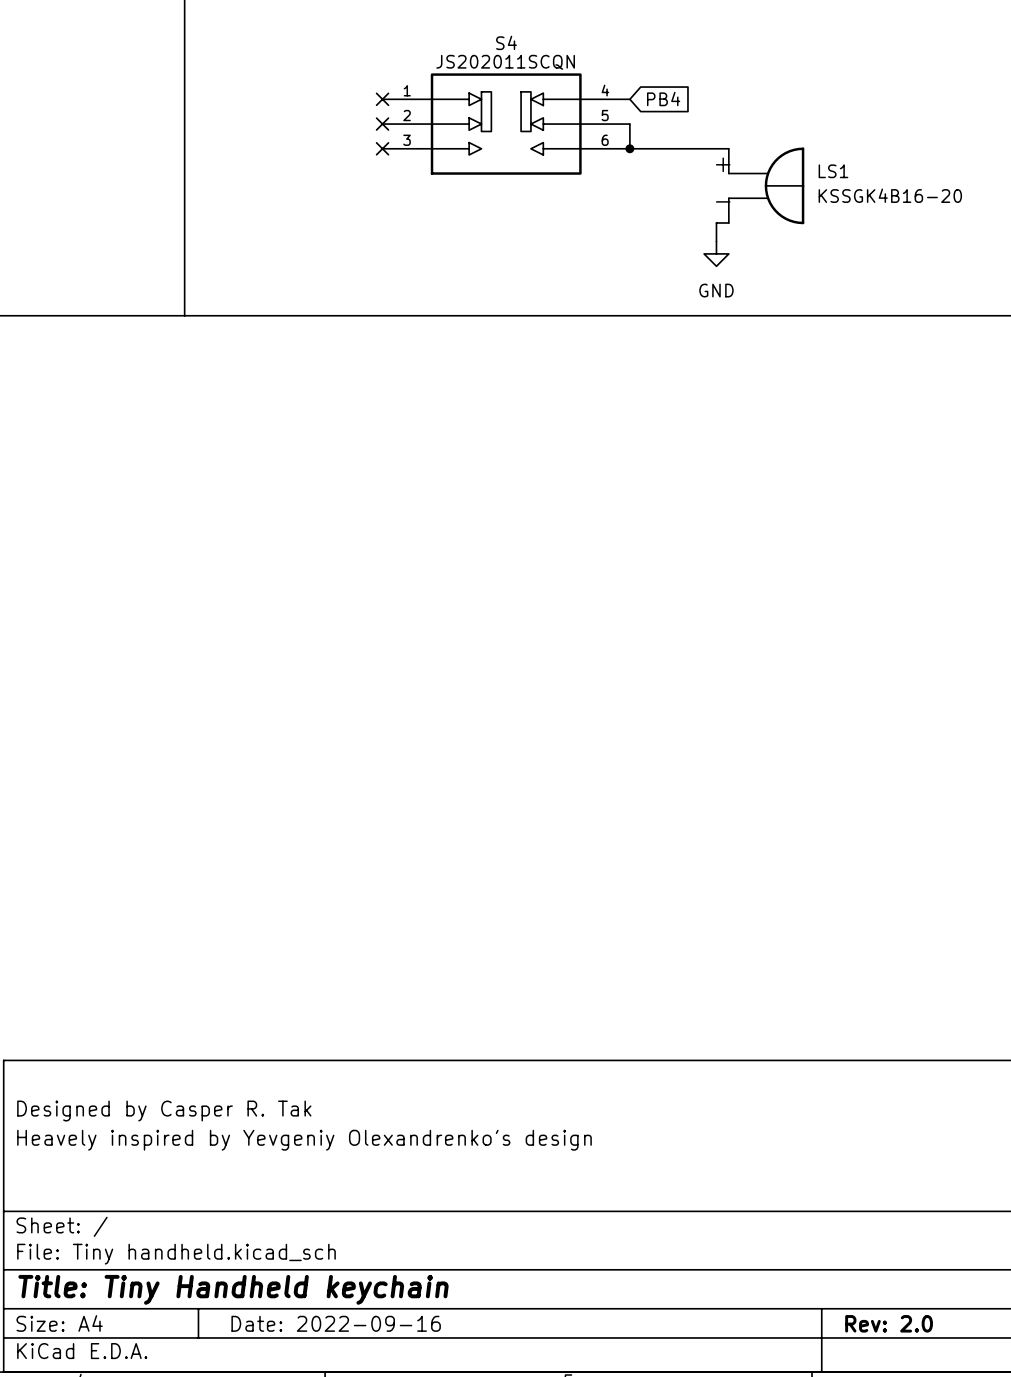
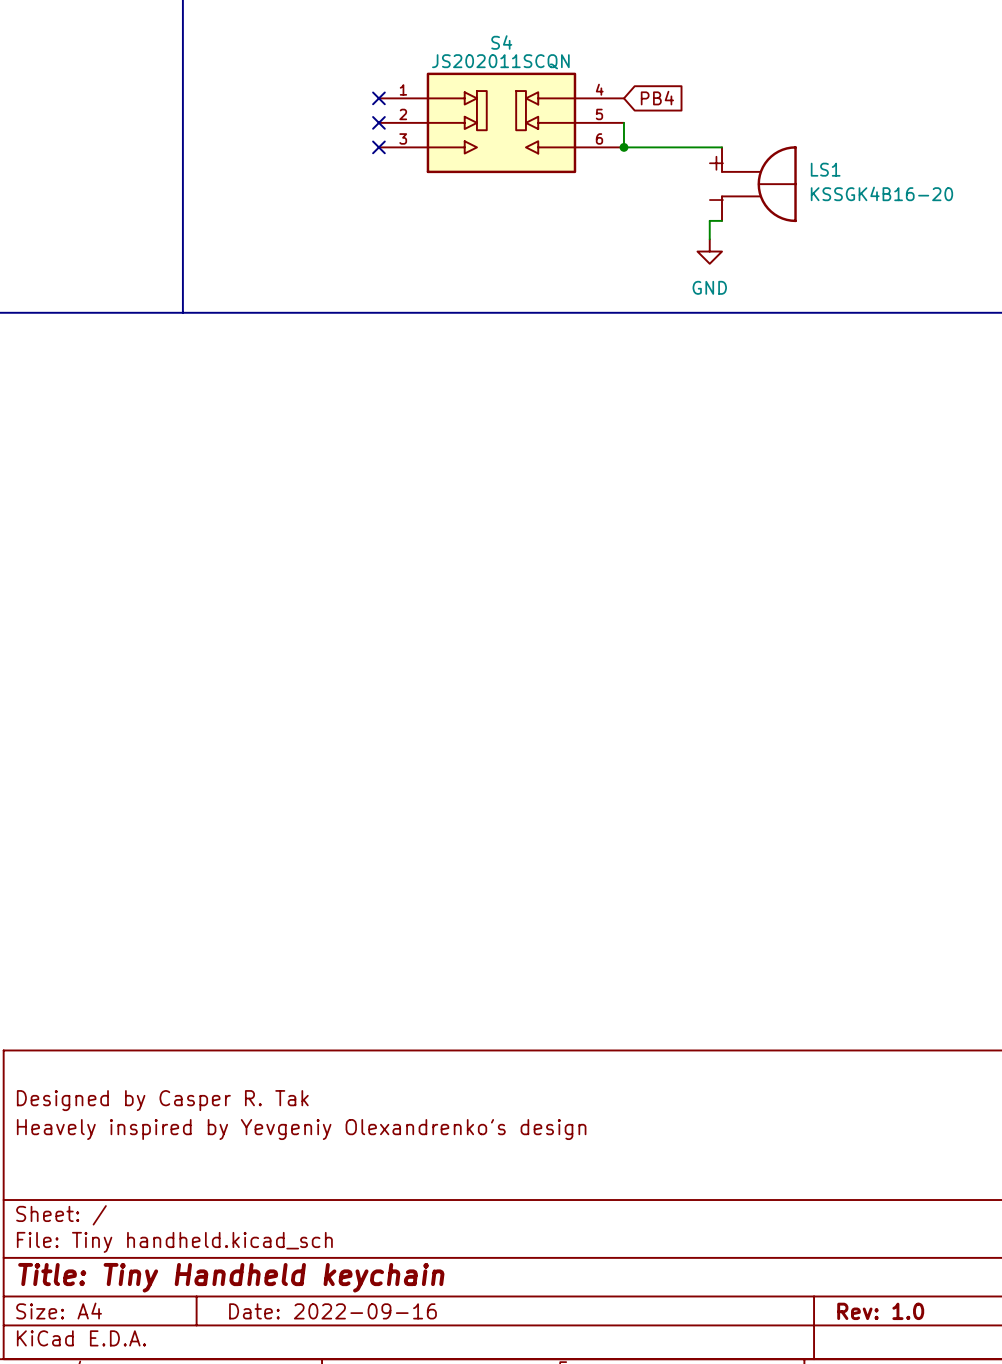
title block: Rev: 2.0 (889, 1323) -> Rev: 1.0 (880, 1311)

